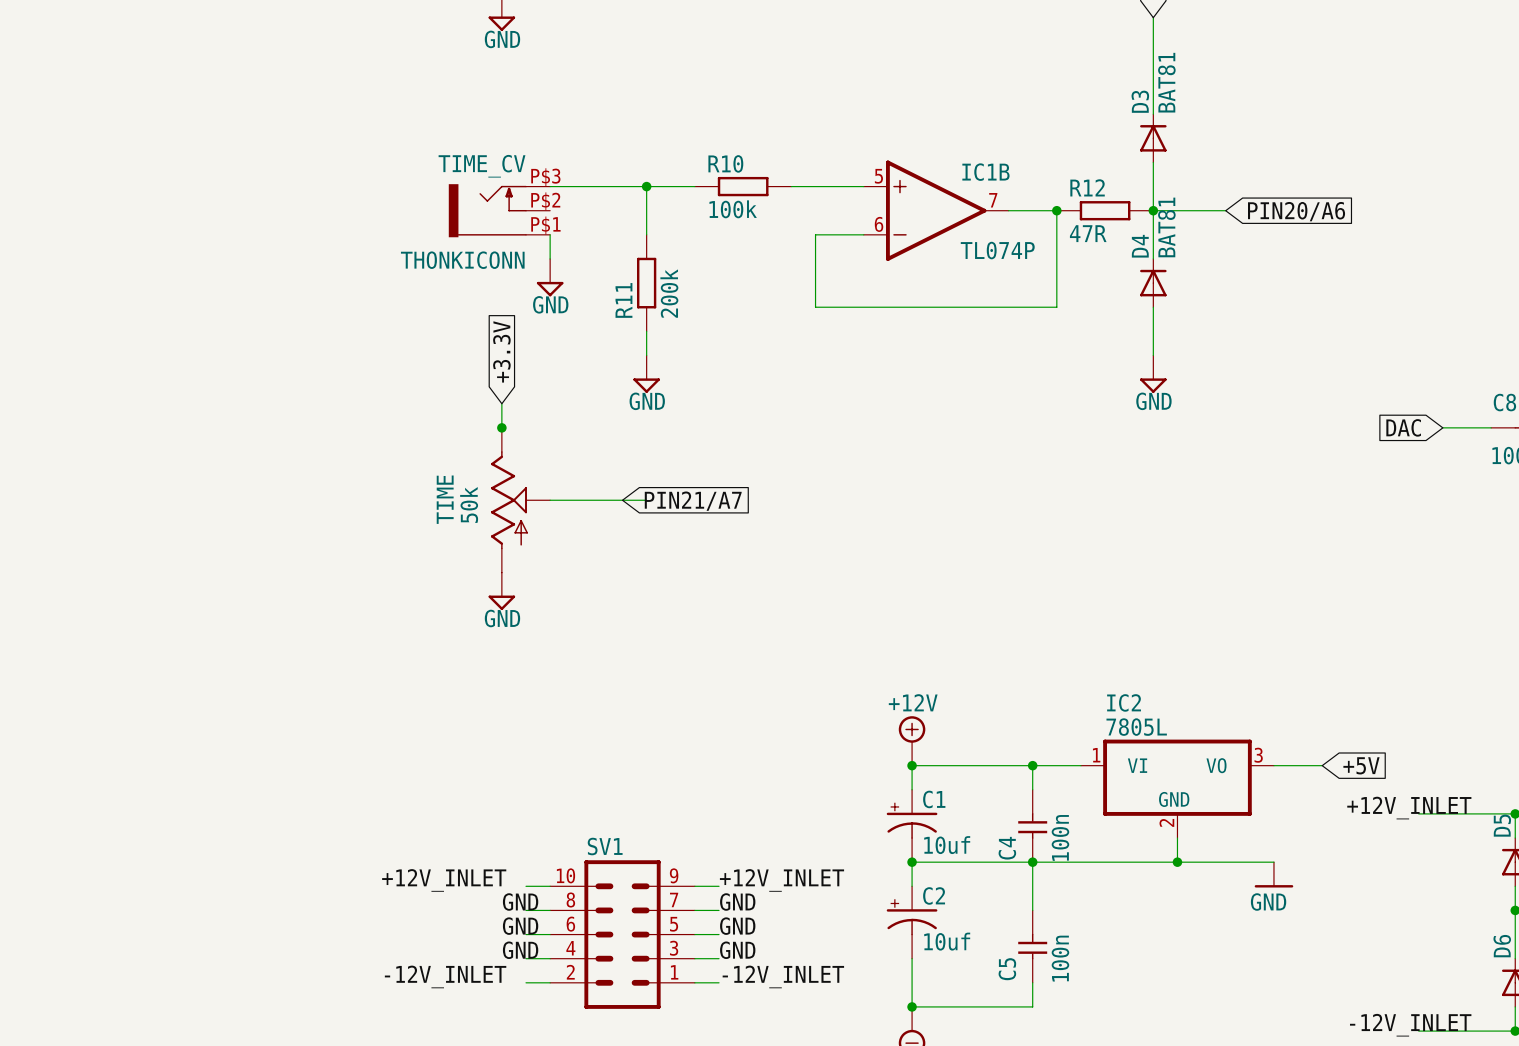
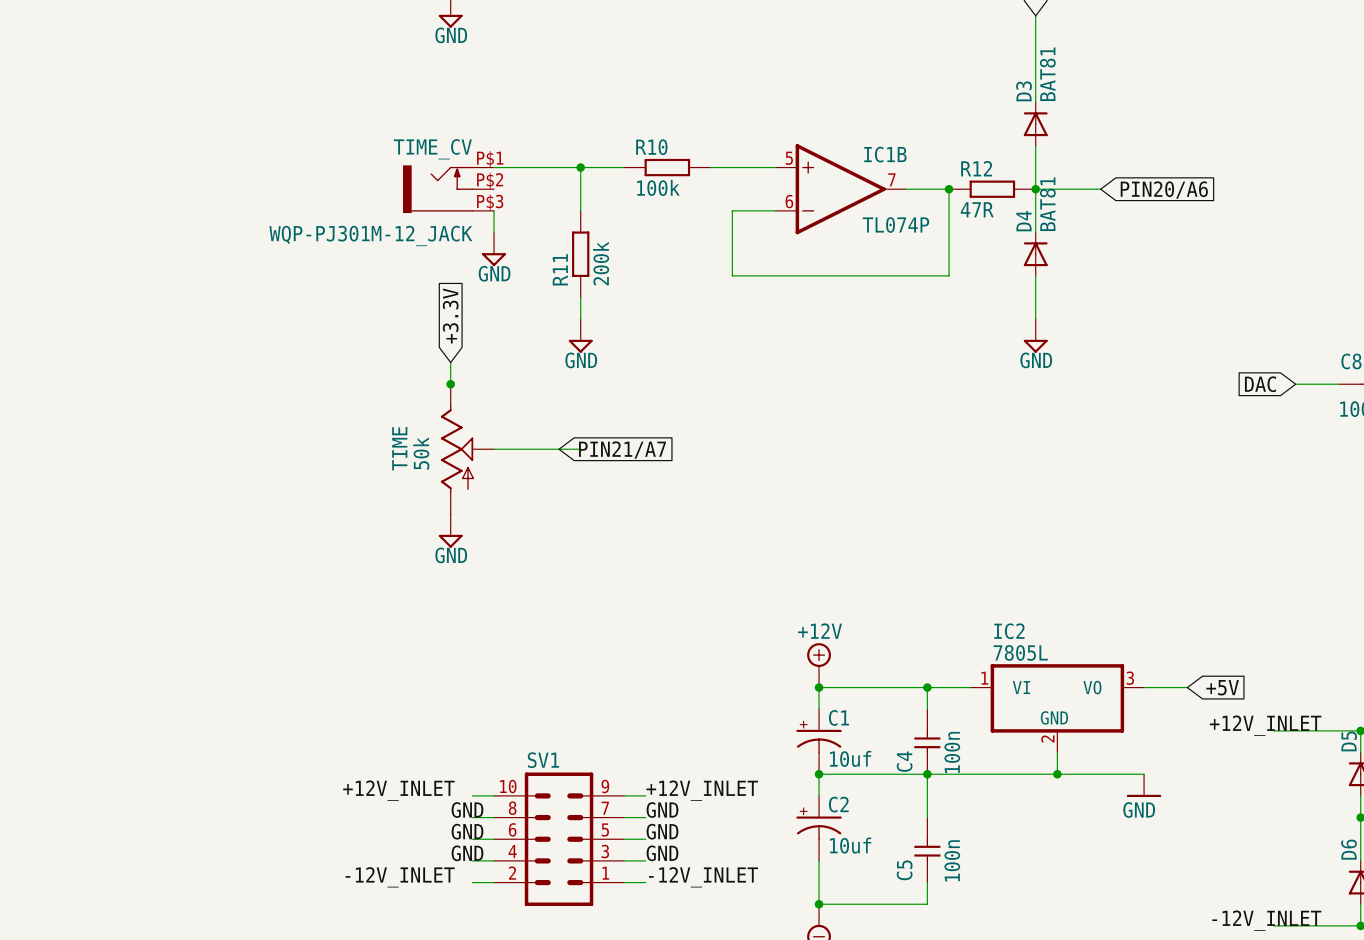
TIME_CV pin number: P$3 (545, 177) -> P$1 (490, 159)
TIME_CV pin number: P$1 (545, 225) -> P$3 (490, 202)
TIME_CV value: THONKICONN (462, 260) -> WQP-PJ301M-12_JACK (370, 235)

